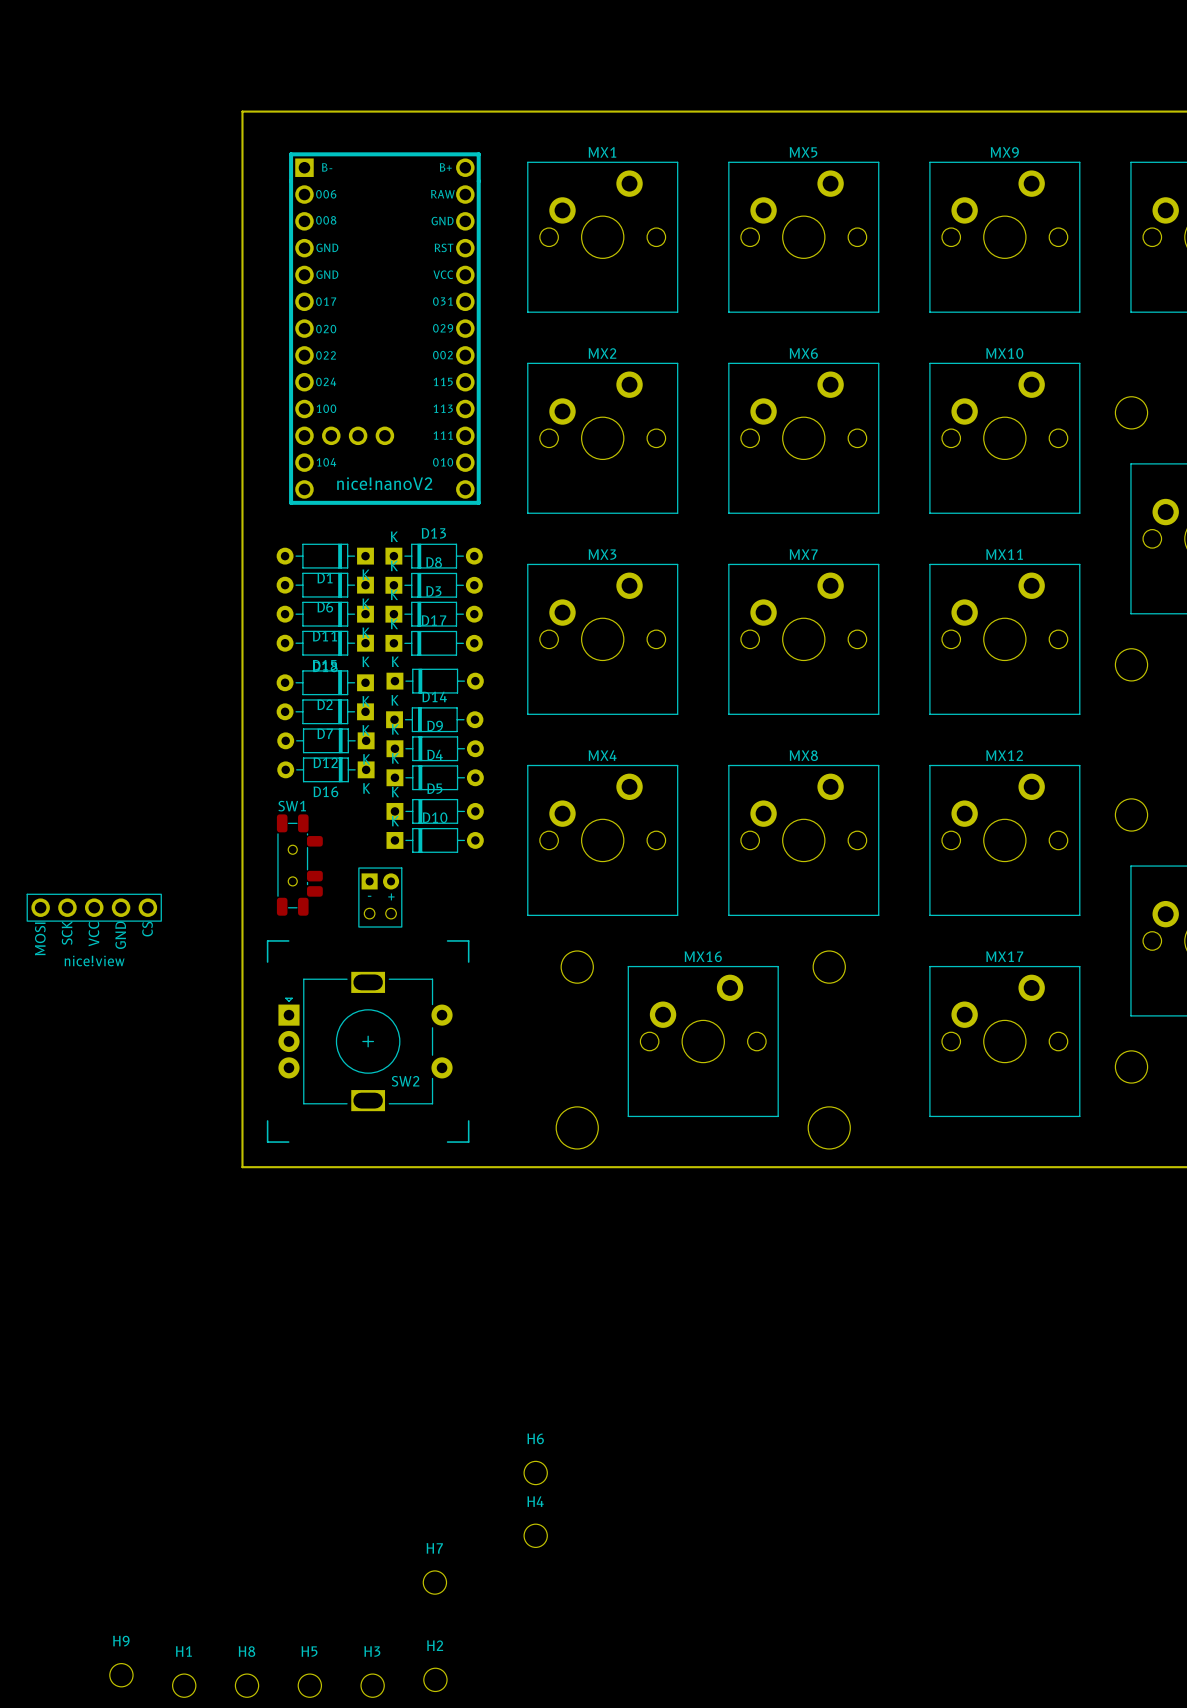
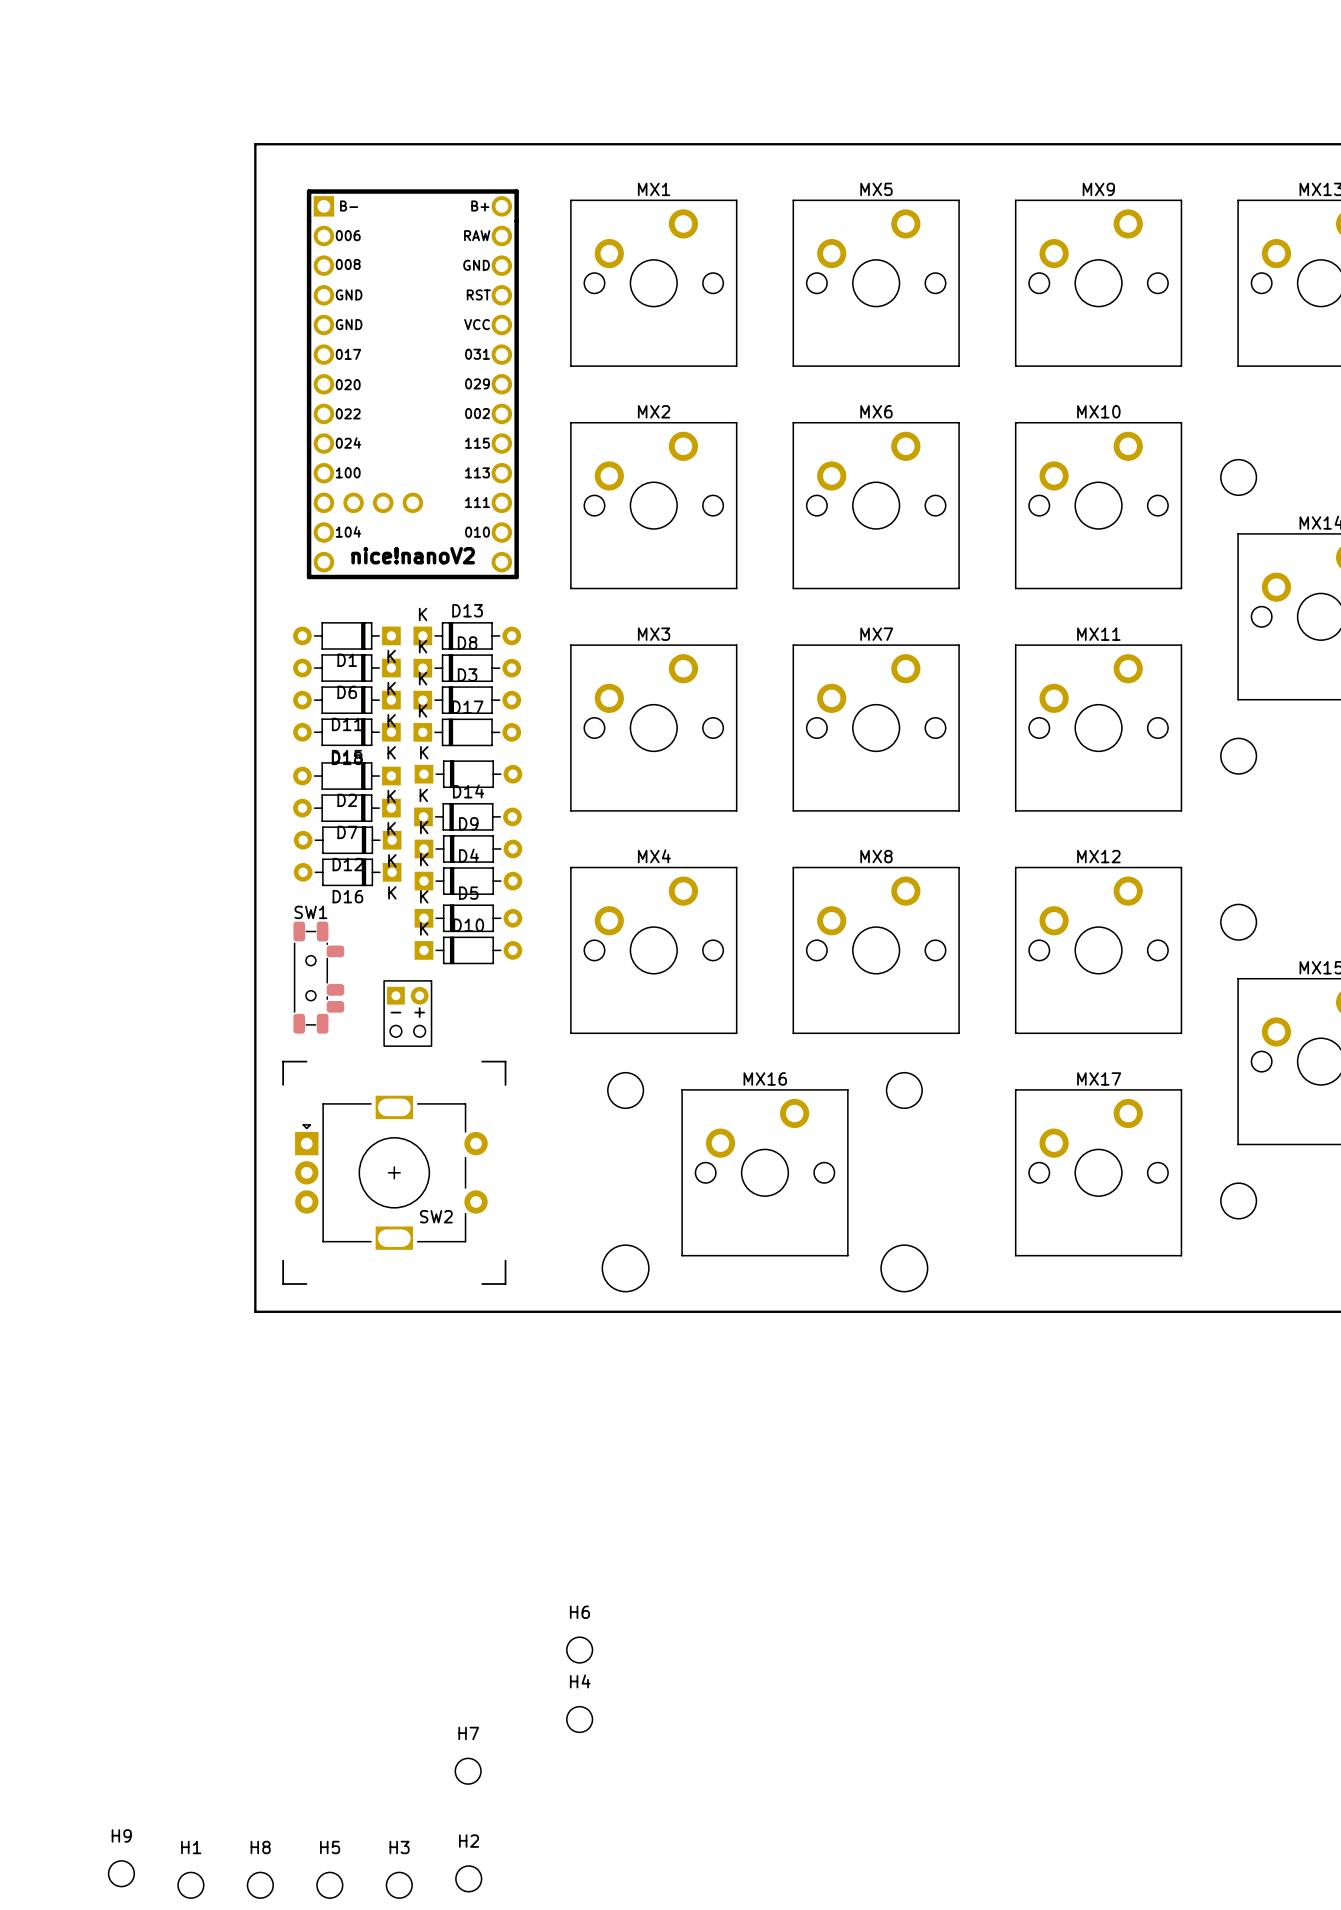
part: nice!view (94, 907) -> none

